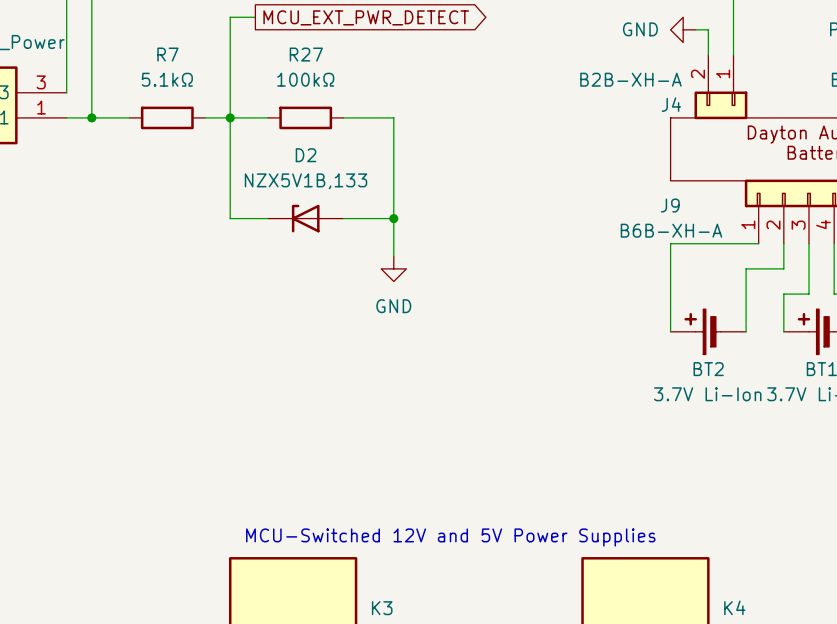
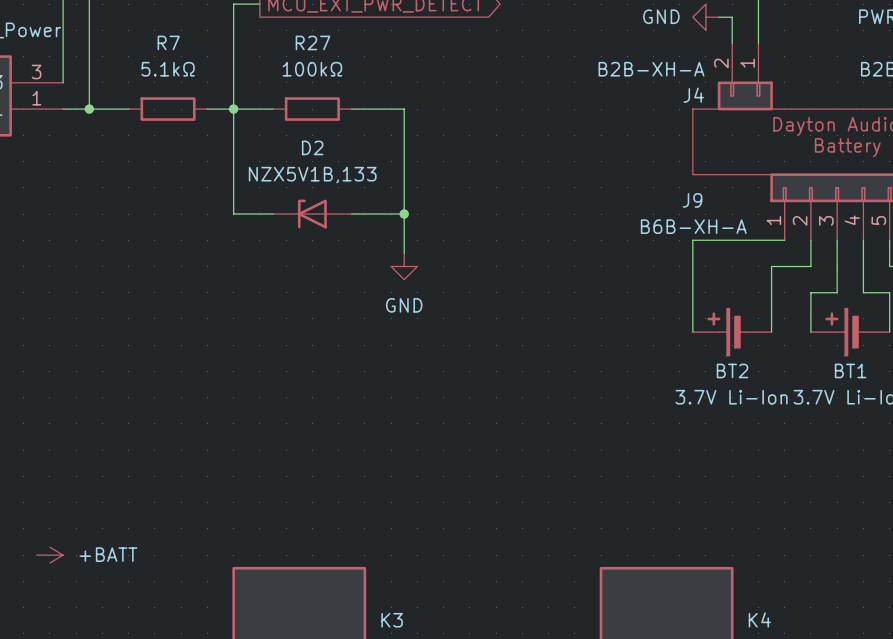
text: MCU-Switched 12V and 5V Power Supplies (450, 537) -> none
power symbol: none -> +BATT (49, 555)

